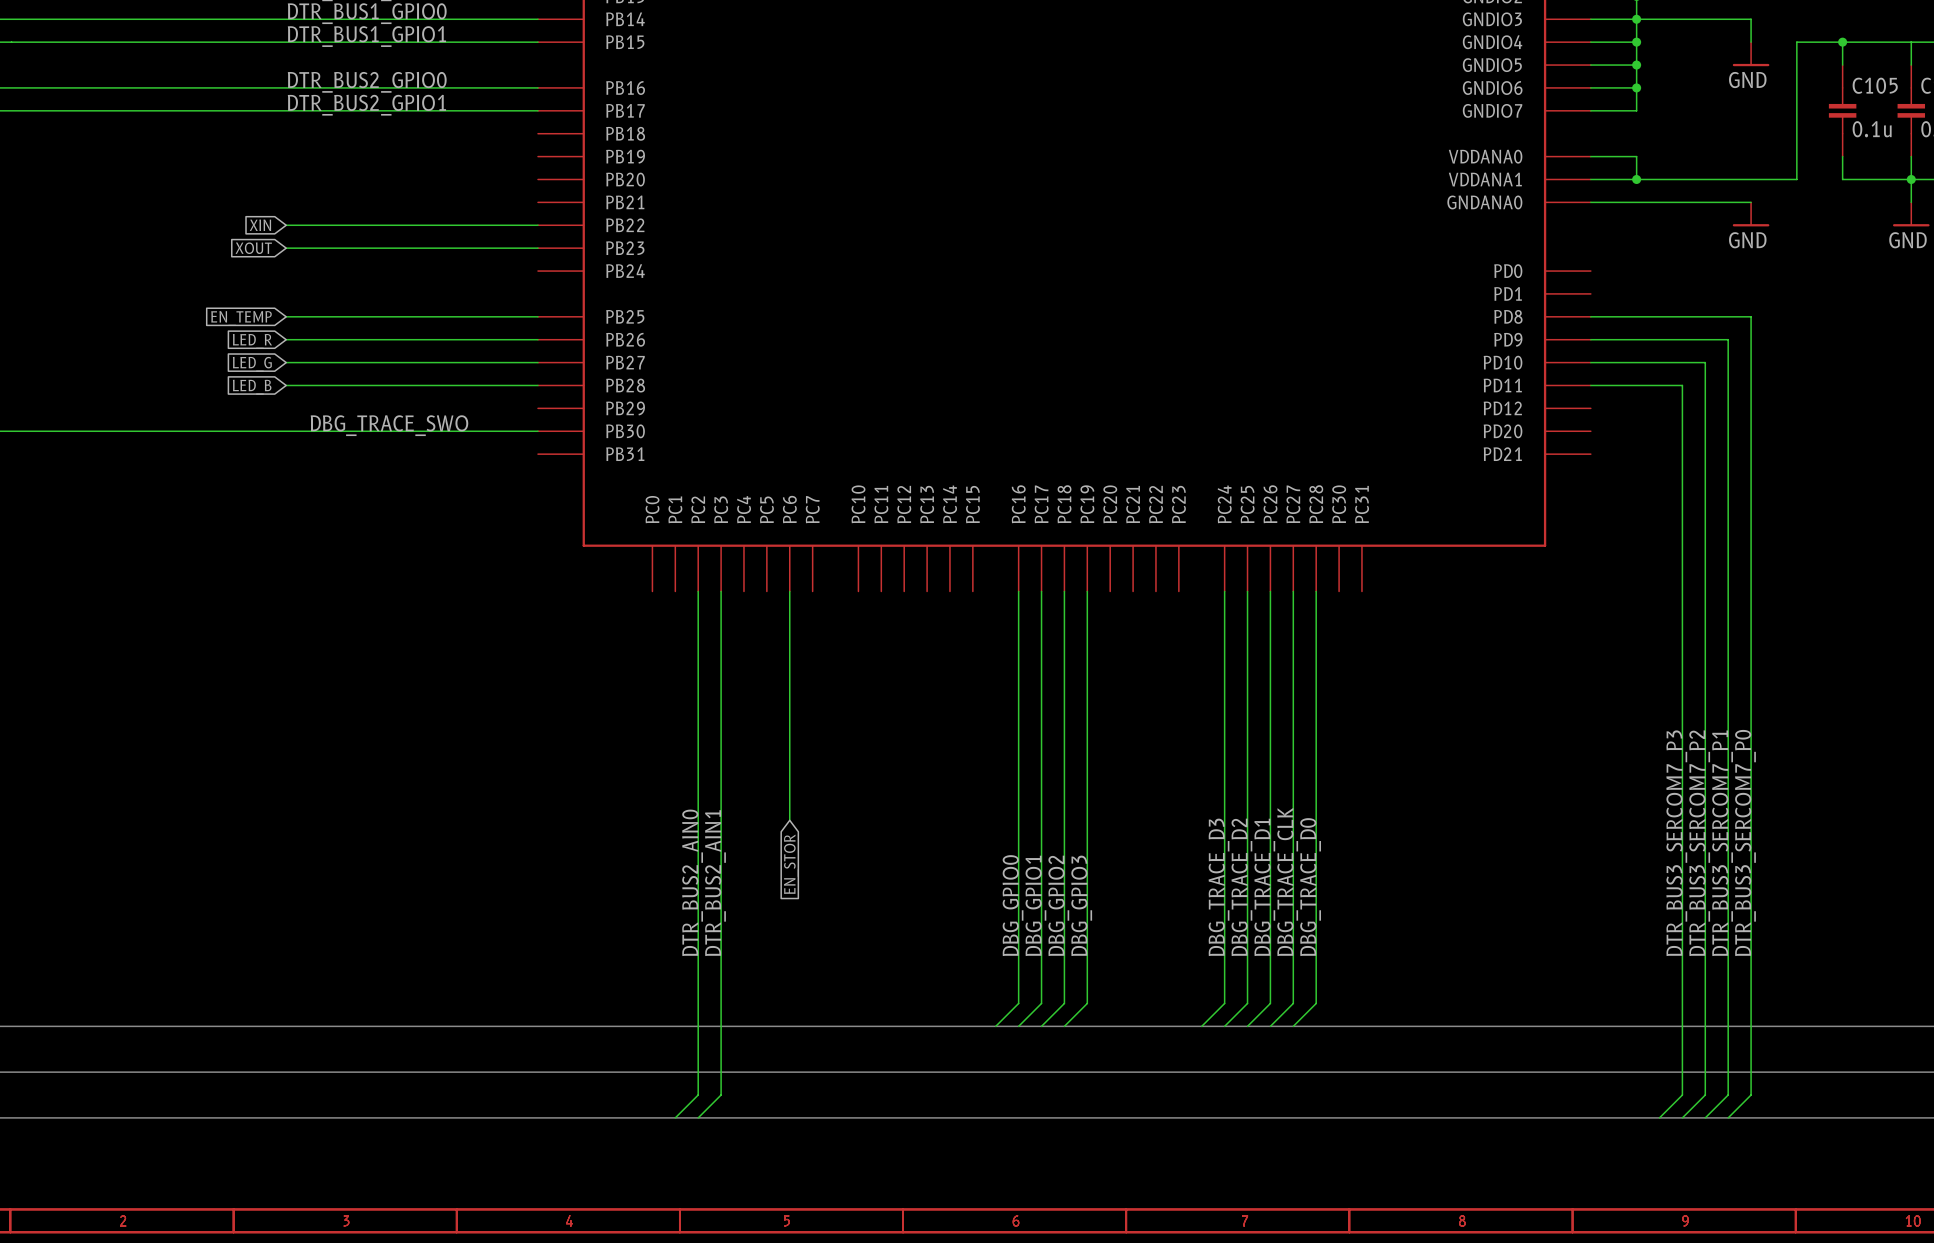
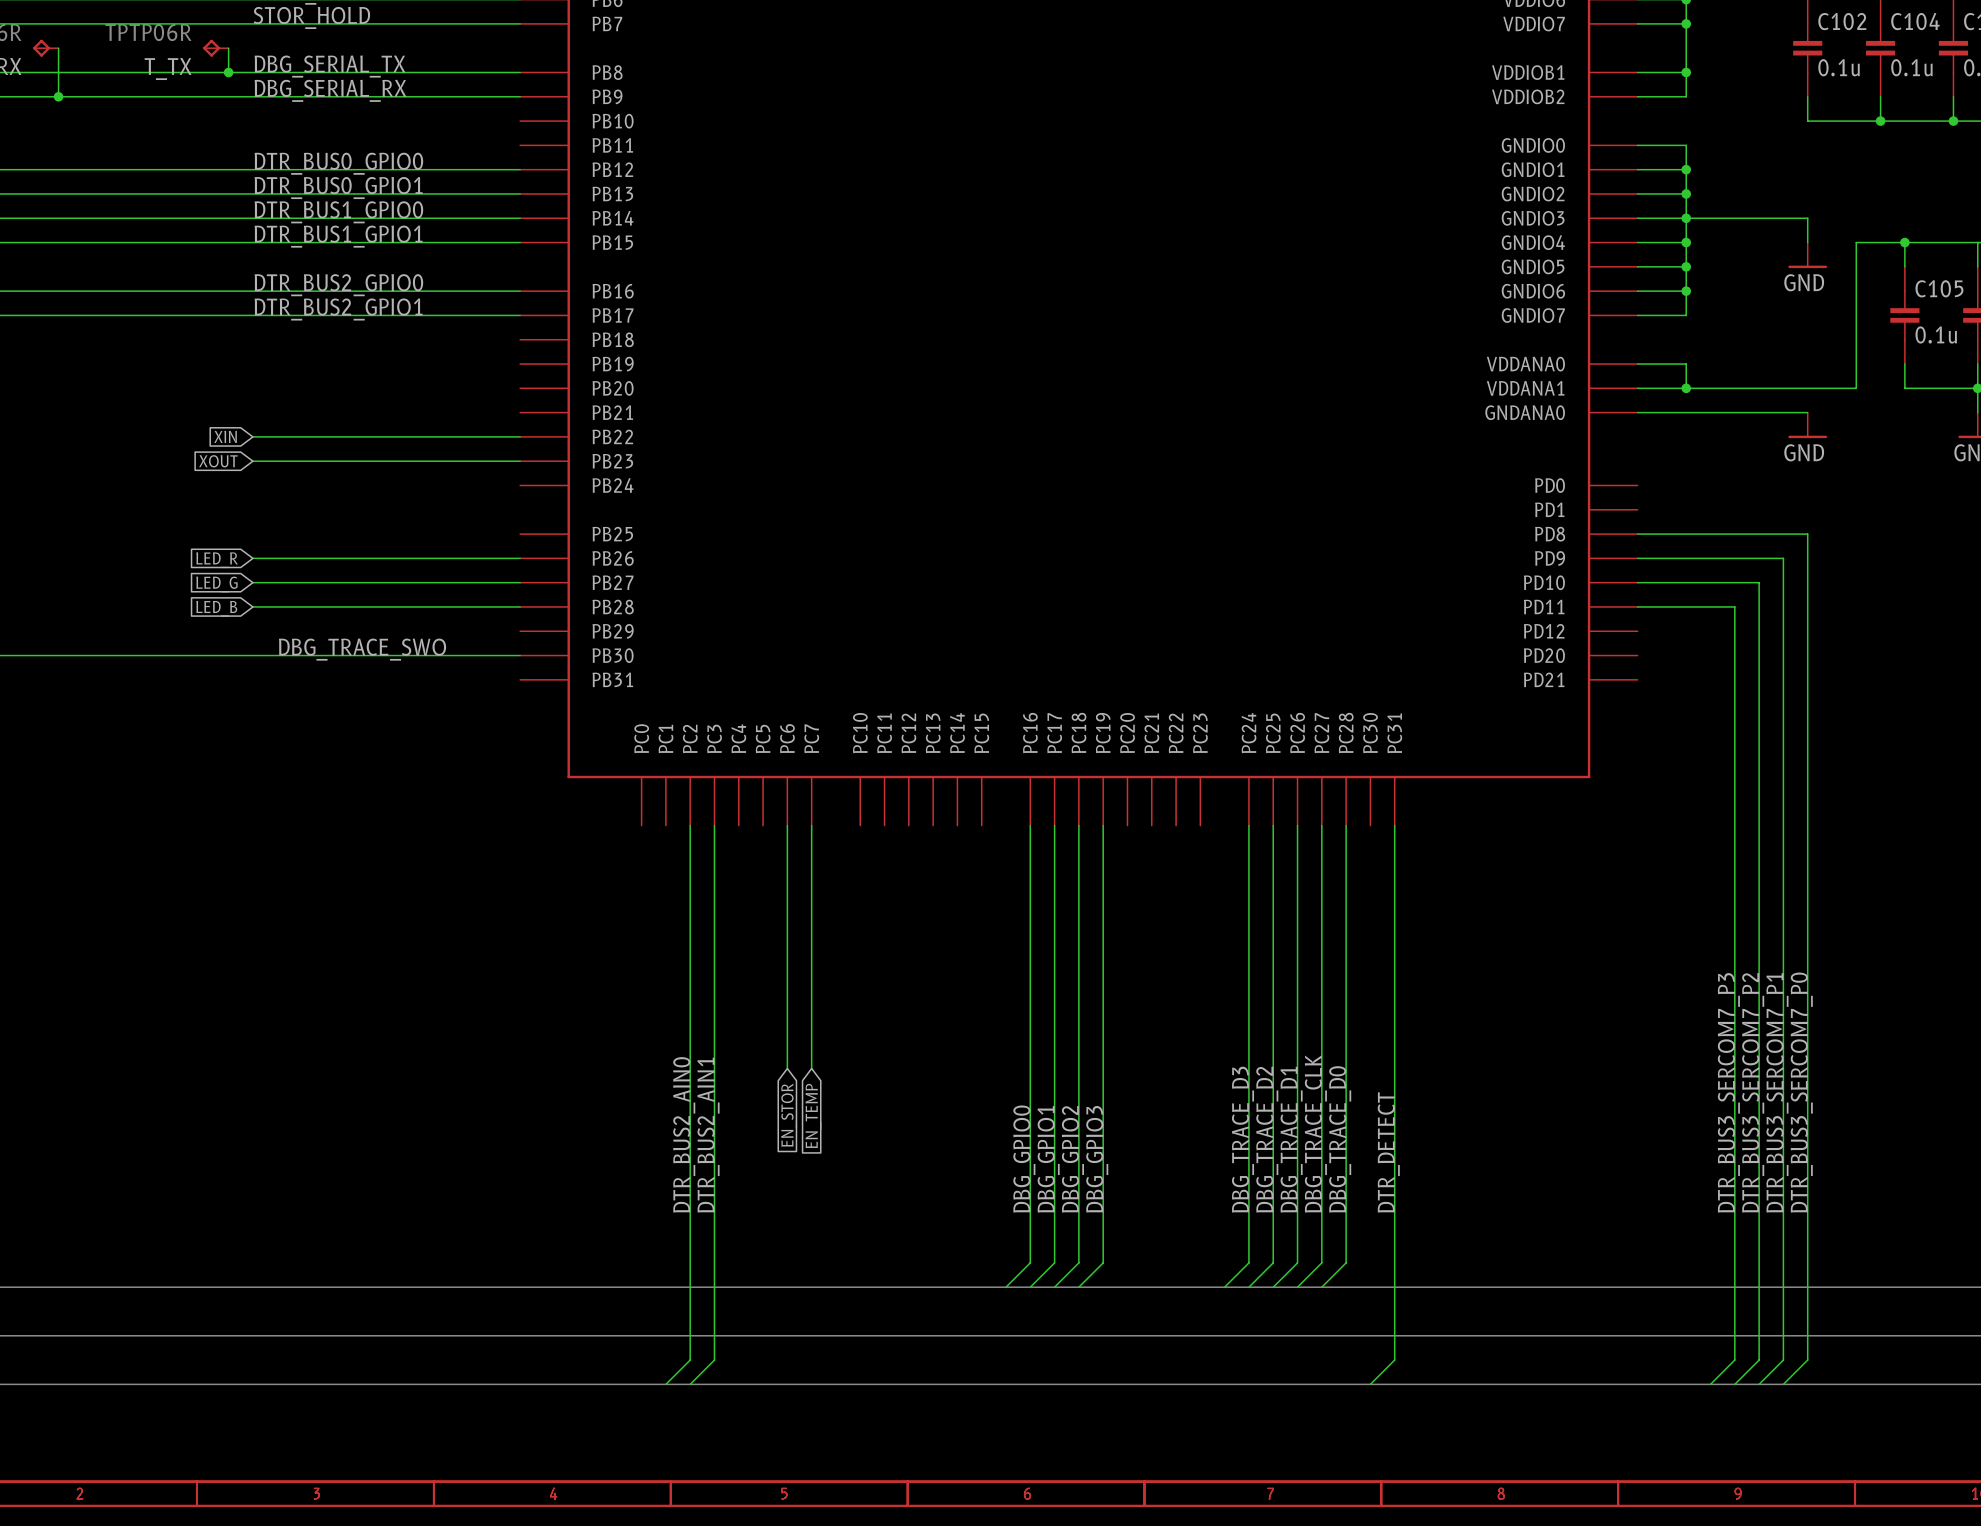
wire: (286, 316) (537, 316) -> none
global label: EN_TEMP (241, 318) -> none
wire: none -> (811, 825) (811, 1068)
wire: none -> (1394, 825) (1394, 1360) (1370, 1384)
global label: none -> EN_TEMP (813, 1116)
label: none -> DTR_DETECT (1388, 1152)

